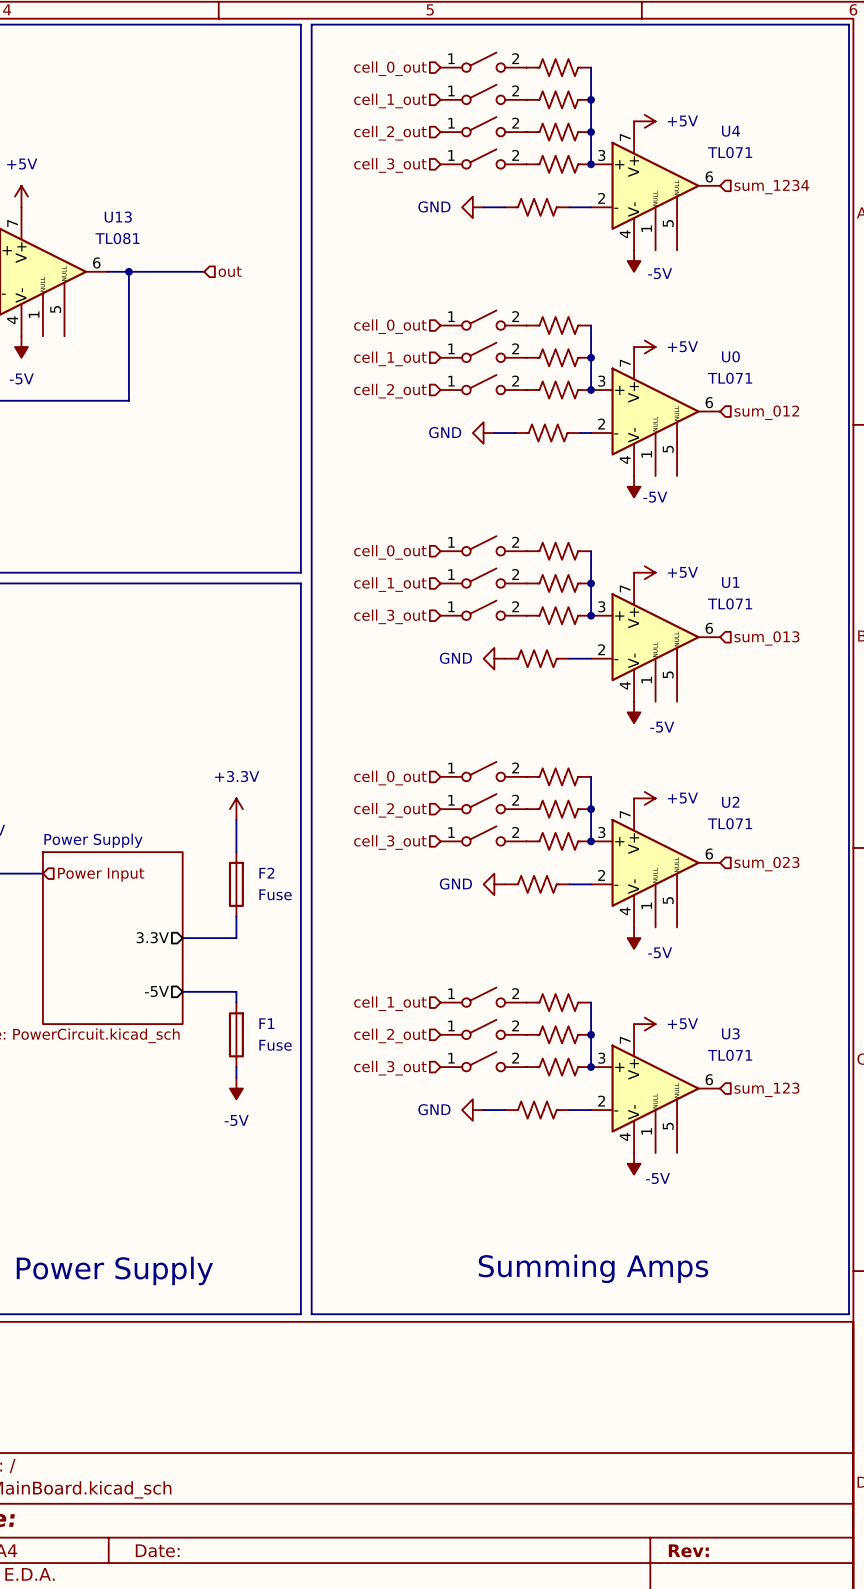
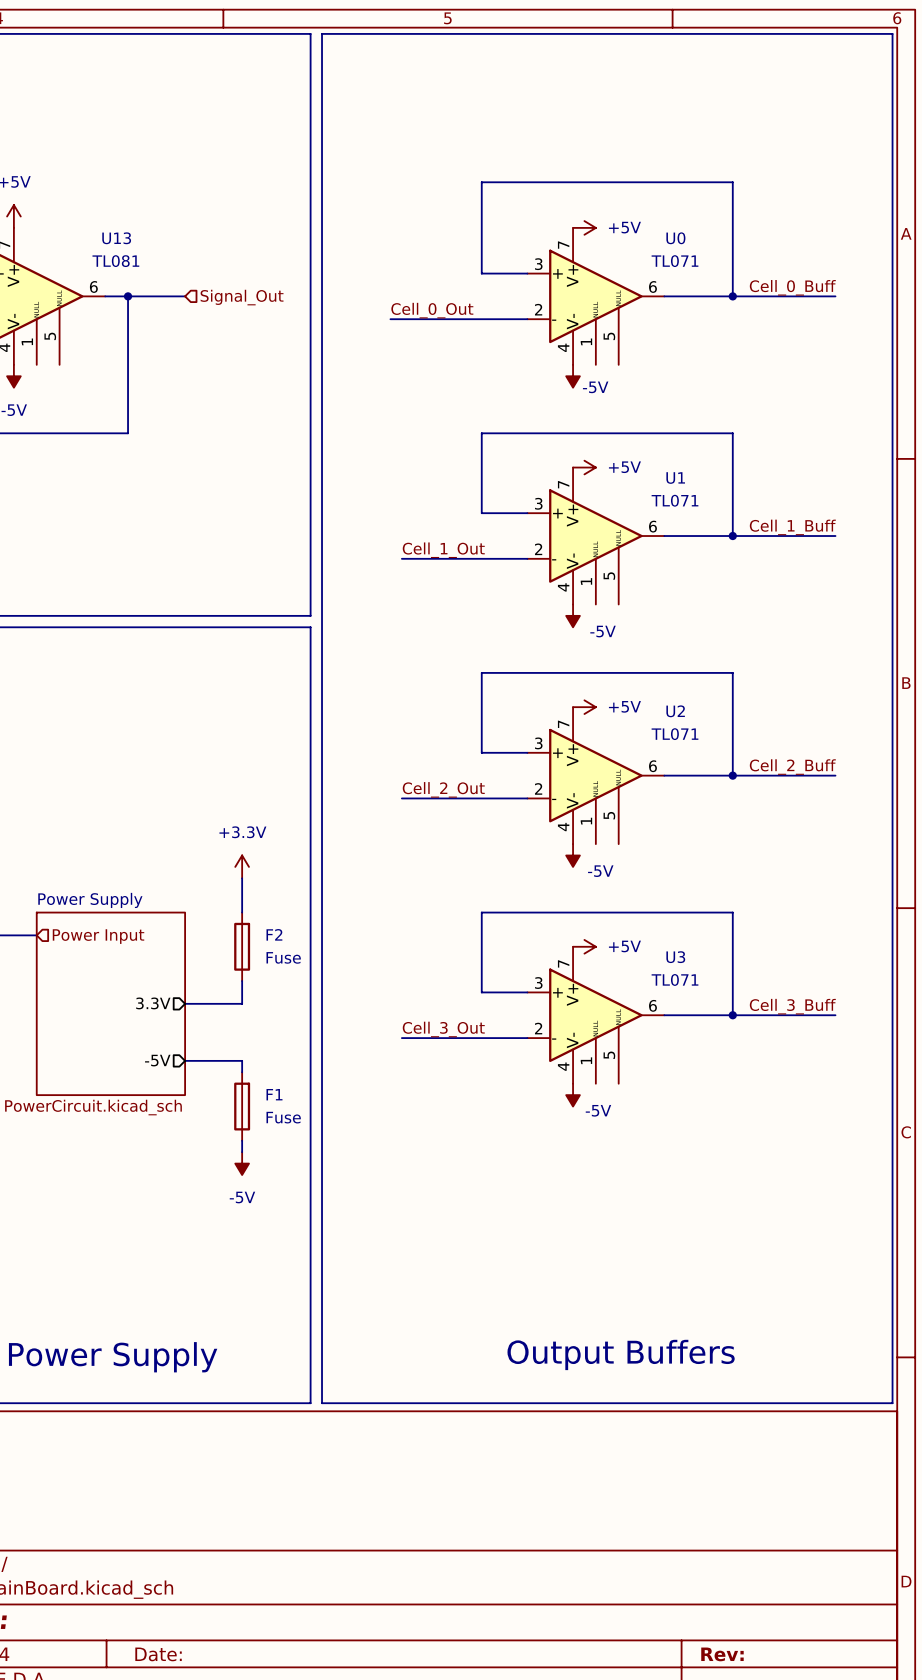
part: (483, 62) -> none
part: (558, 67) -> none
wire: (591, 67) (591, 164) -> none
hierarchical label: cell_0_out (390, 68) -> none
part: (483, 94) -> none
part: (558, 99) -> none
junction: (591, 99) -> none
hierarchical label: cell_1_out (390, 100) -> none
power symbol: +5V (644, 121) -> none
part: (483, 126) -> none
part: (558, 132) -> none
junction: (591, 132) -> none
hierarchical label: cell_2_out (390, 133) -> none
part: (483, 158) -> none
part: (558, 164) -> none
junction: (591, 164) -> none
hierarchical label: cell_3_out (390, 165) -> none
U4: TL071 (655, 185) -> none
hierarchical label: sum_1234 (771, 187) -> none
power symbol: GND (472, 207) -> none
wire: (483, 207) (505, 207) -> none
part: (537, 207) -> none
power symbol: none -> +5V (584, 227)
wire: (569, 207) (591, 207) -> none
wire: none -> (527, 273) (481, 273) (481, 182) (732, 182) (732, 296)
power symbol: -5V (634, 261) -> none
label: none -> Cell_0_Buff (792, 287)
wire: (182, 271) (204, 271) -> none
hierarchical label: out (230, 271) -> none
wire: none -> (664, 296) (835, 296)
junction: none -> (732, 296)
hierarchical label: none -> Signal_Out (242, 297)
label: none -> Cell_0_Out (432, 310)
wire: none -> (390, 319) (527, 319)
part: (483, 320) -> none
part: (558, 325) -> none
wire: (591, 325) (591, 390) -> none
hierarchical label: cell_0_out (390, 326) -> none
power symbol: none -> -5V (573, 376)
power symbol: +5V (644, 347) -> none
part: (483, 352) -> none
part: (558, 357) -> none
junction: (591, 357) -> none
hierarchical label: cell_1_out (390, 358) -> none
part: (483, 384) -> none
part: (558, 390) -> none
junction: (591, 390) -> none
hierarchical label: cell_2_out (390, 391) -> none
U0 position: (655, 411) -> (595, 296)
hierarchical label: sum_012 (766, 412) -> none
power symbol: GND (483, 433) -> none
wire: (494, 433) (515, 433) -> none
part: (548, 433) -> none
power symbol: none -> +5V (584, 467)
wire: none -> (527, 513) (481, 513) (481, 433) (732, 433) (732, 536)
power symbol: -5V (634, 486) -> none
label: none -> Cell_1_Buff (792, 527)
wire: none -> (664, 536) (835, 536)
junction: none -> (732, 536)
label: none -> Cell_1_Out (443, 550)
wire: none -> (401, 558) (527, 558)
part: (483, 545) -> none
part: (558, 551) -> none
wire: (591, 551) (591, 615) -> none
hierarchical label: cell_0_out (390, 552) -> none
power symbol: none -> -5V (573, 615)
power symbol: +5V (644, 572) -> none
part: (483, 578) -> none
part: (558, 583) -> none
junction: (591, 583) -> none
hierarchical label: cell_1_out (390, 584) -> none
part: (483, 610) -> none
part: (558, 615) -> none
junction: (591, 615) -> none
hierarchical label: cell_3_out (390, 616) -> none
U1 position: (655, 637) -> (595, 536)
hierarchical label: sum_013 (766, 638) -> none
power symbol: GND (494, 658) -> none
part: (537, 658) -> none
power symbol: none -> +5V (584, 707)
wire: (569, 658) (591, 658) -> none
wire: none -> (527, 752) (481, 752) (481, 672) (732, 672) (732, 775)
power symbol: -5V (634, 712) -> none
label: none -> Cell_2_Buff (792, 767)
wire: none -> (664, 775) (835, 775)
junction: none -> (732, 775)
label: none -> Cell_2_Out (443, 789)
wire: none -> (401, 798) (527, 798)
part: (483, 771) -> none
part: (558, 776) -> none
wire: (591, 776) (591, 841) -> none
hierarchical label: cell_0_out (390, 778) -> none
power symbol: none -> -5V (573, 855)
power symbol: +5V (644, 798) -> none
part: (483, 803) -> none
part: (558, 809) -> none
junction: (591, 809) -> none
hierarchical label: cell_2_out (390, 810) -> none
part: (483, 836) -> none
part: (558, 841) -> none
junction: (591, 841) -> none
hierarchical label: cell_3_out (390, 842) -> none
U2 position: (655, 862) -> (595, 775)
hierarchical label: sum_023 (766, 864) -> none
power symbol: GND (494, 884) -> none
part: (537, 884) -> none
power symbol: none -> +5V (584, 946)
wire: (569, 884) (591, 884) -> none
wire: none -> (527, 992) (481, 992) (481, 912) (732, 912) (732, 1015)
power symbol: -5V (634, 938) -> none
label: none -> Cell_3_Buff (792, 1006)
wire: none -> (664, 1015) (835, 1015)
junction: none -> (732, 1015)
label: none -> Cell_3_Out (443, 1029)
wire: none -> (401, 1038) (527, 1038)
part: (483, 997) -> none
part: (558, 1002) -> none
wire: (591, 1002) (591, 1067) -> none
hierarchical label: cell_1_out (390, 1003) -> none
power symbol: none -> -5V (573, 1095)
power symbol: +5V (644, 1024) -> none
part: (483, 1029) -> none
part: (558, 1034) -> none
junction: (591, 1034) -> none
hierarchical label: cell_2_out (390, 1035) -> none
part: (483, 1061) -> none
part: (558, 1067) -> none
junction: (591, 1067) -> none
hierarchical label: cell_3_out (390, 1068) -> none
U3 position: (655, 1088) -> (595, 1015)
hierarchical label: sum_123 (766, 1089) -> none
power symbol: GND (472, 1110) -> none
wire: (483, 1110) (505, 1110) -> none
part: (537, 1110) -> none
wire: (569, 1110) (591, 1110) -> none
power symbol: -5V (634, 1163) -> none
text: Summing Amps (593, 1268) -> Output Buffers (621, 1354)

